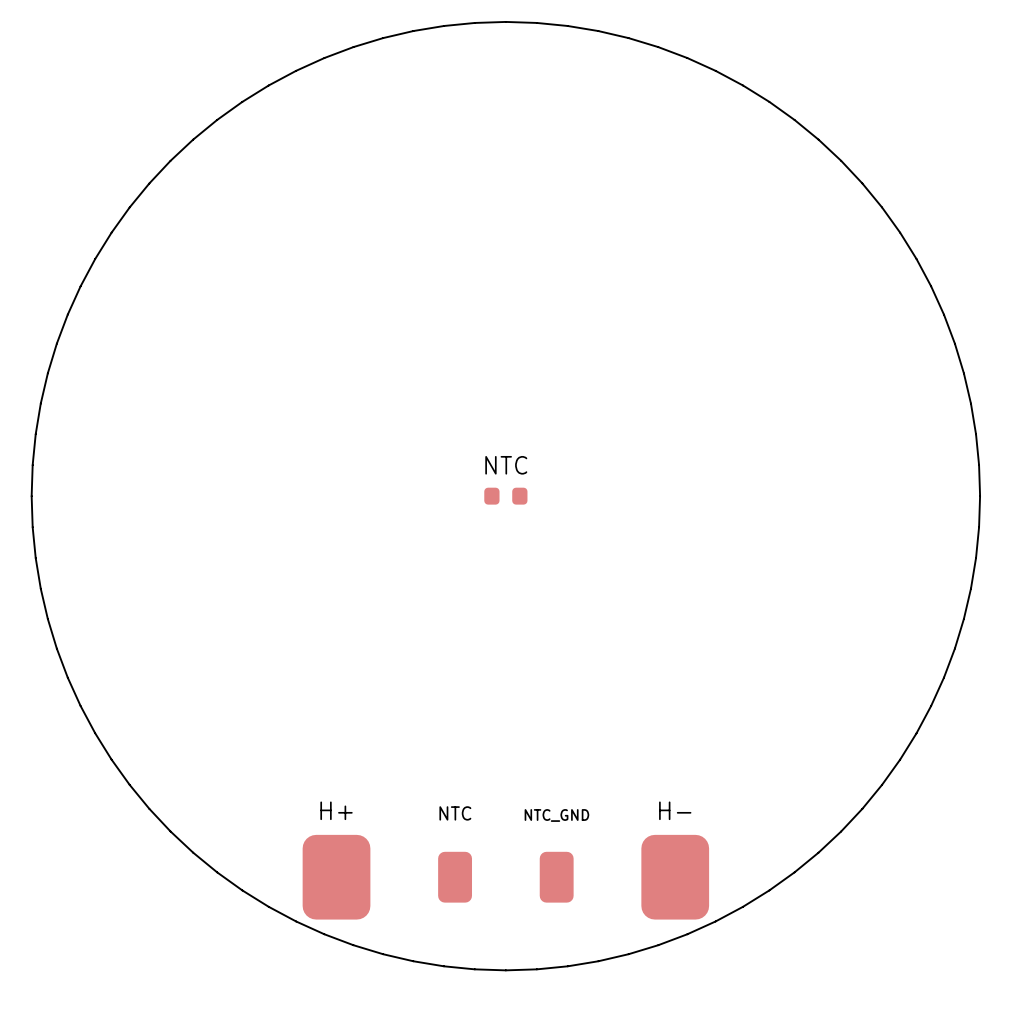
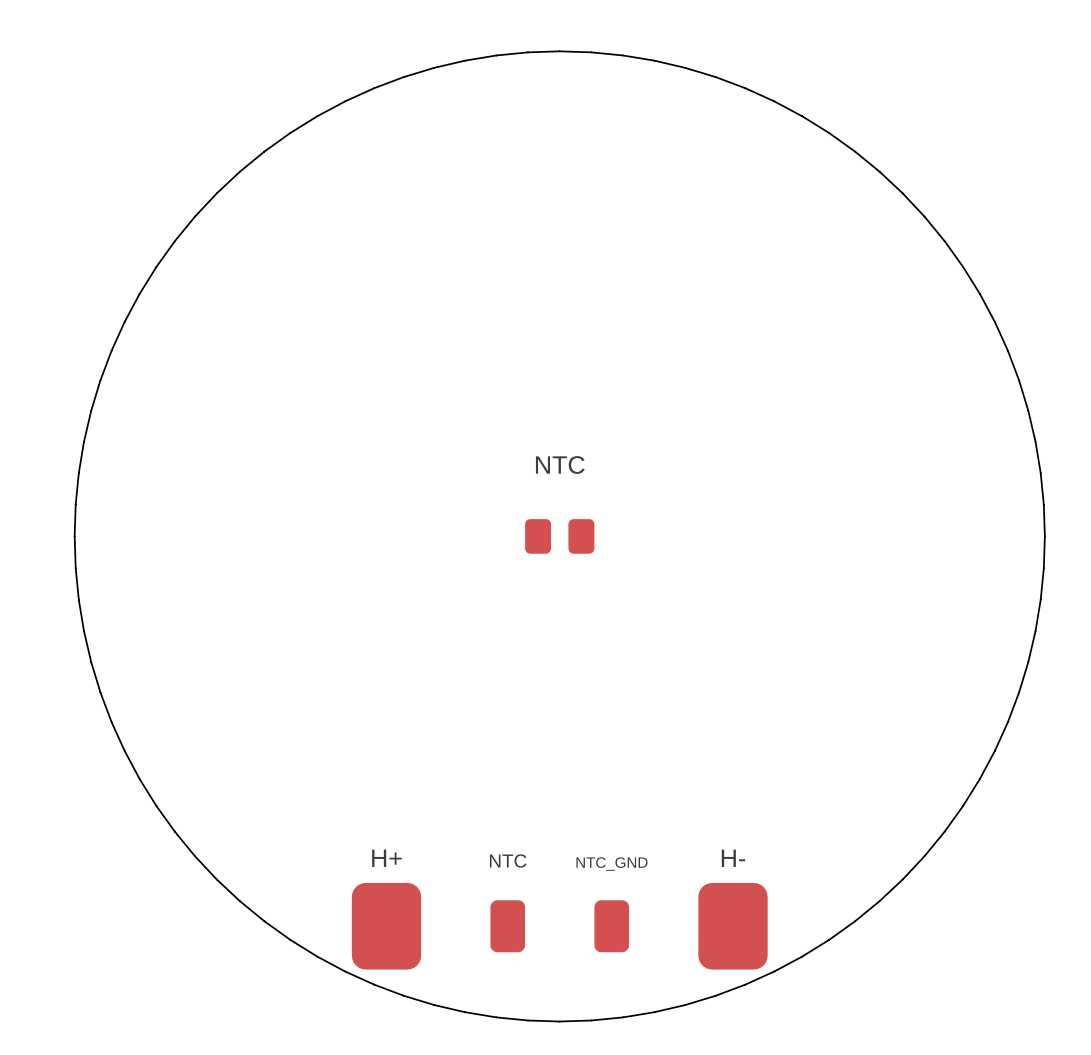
text position: NTC (506, 465) -> NTC (560, 465)
part footprint: [484, 487, 528, 505] -> [525, 519, 595, 554]

